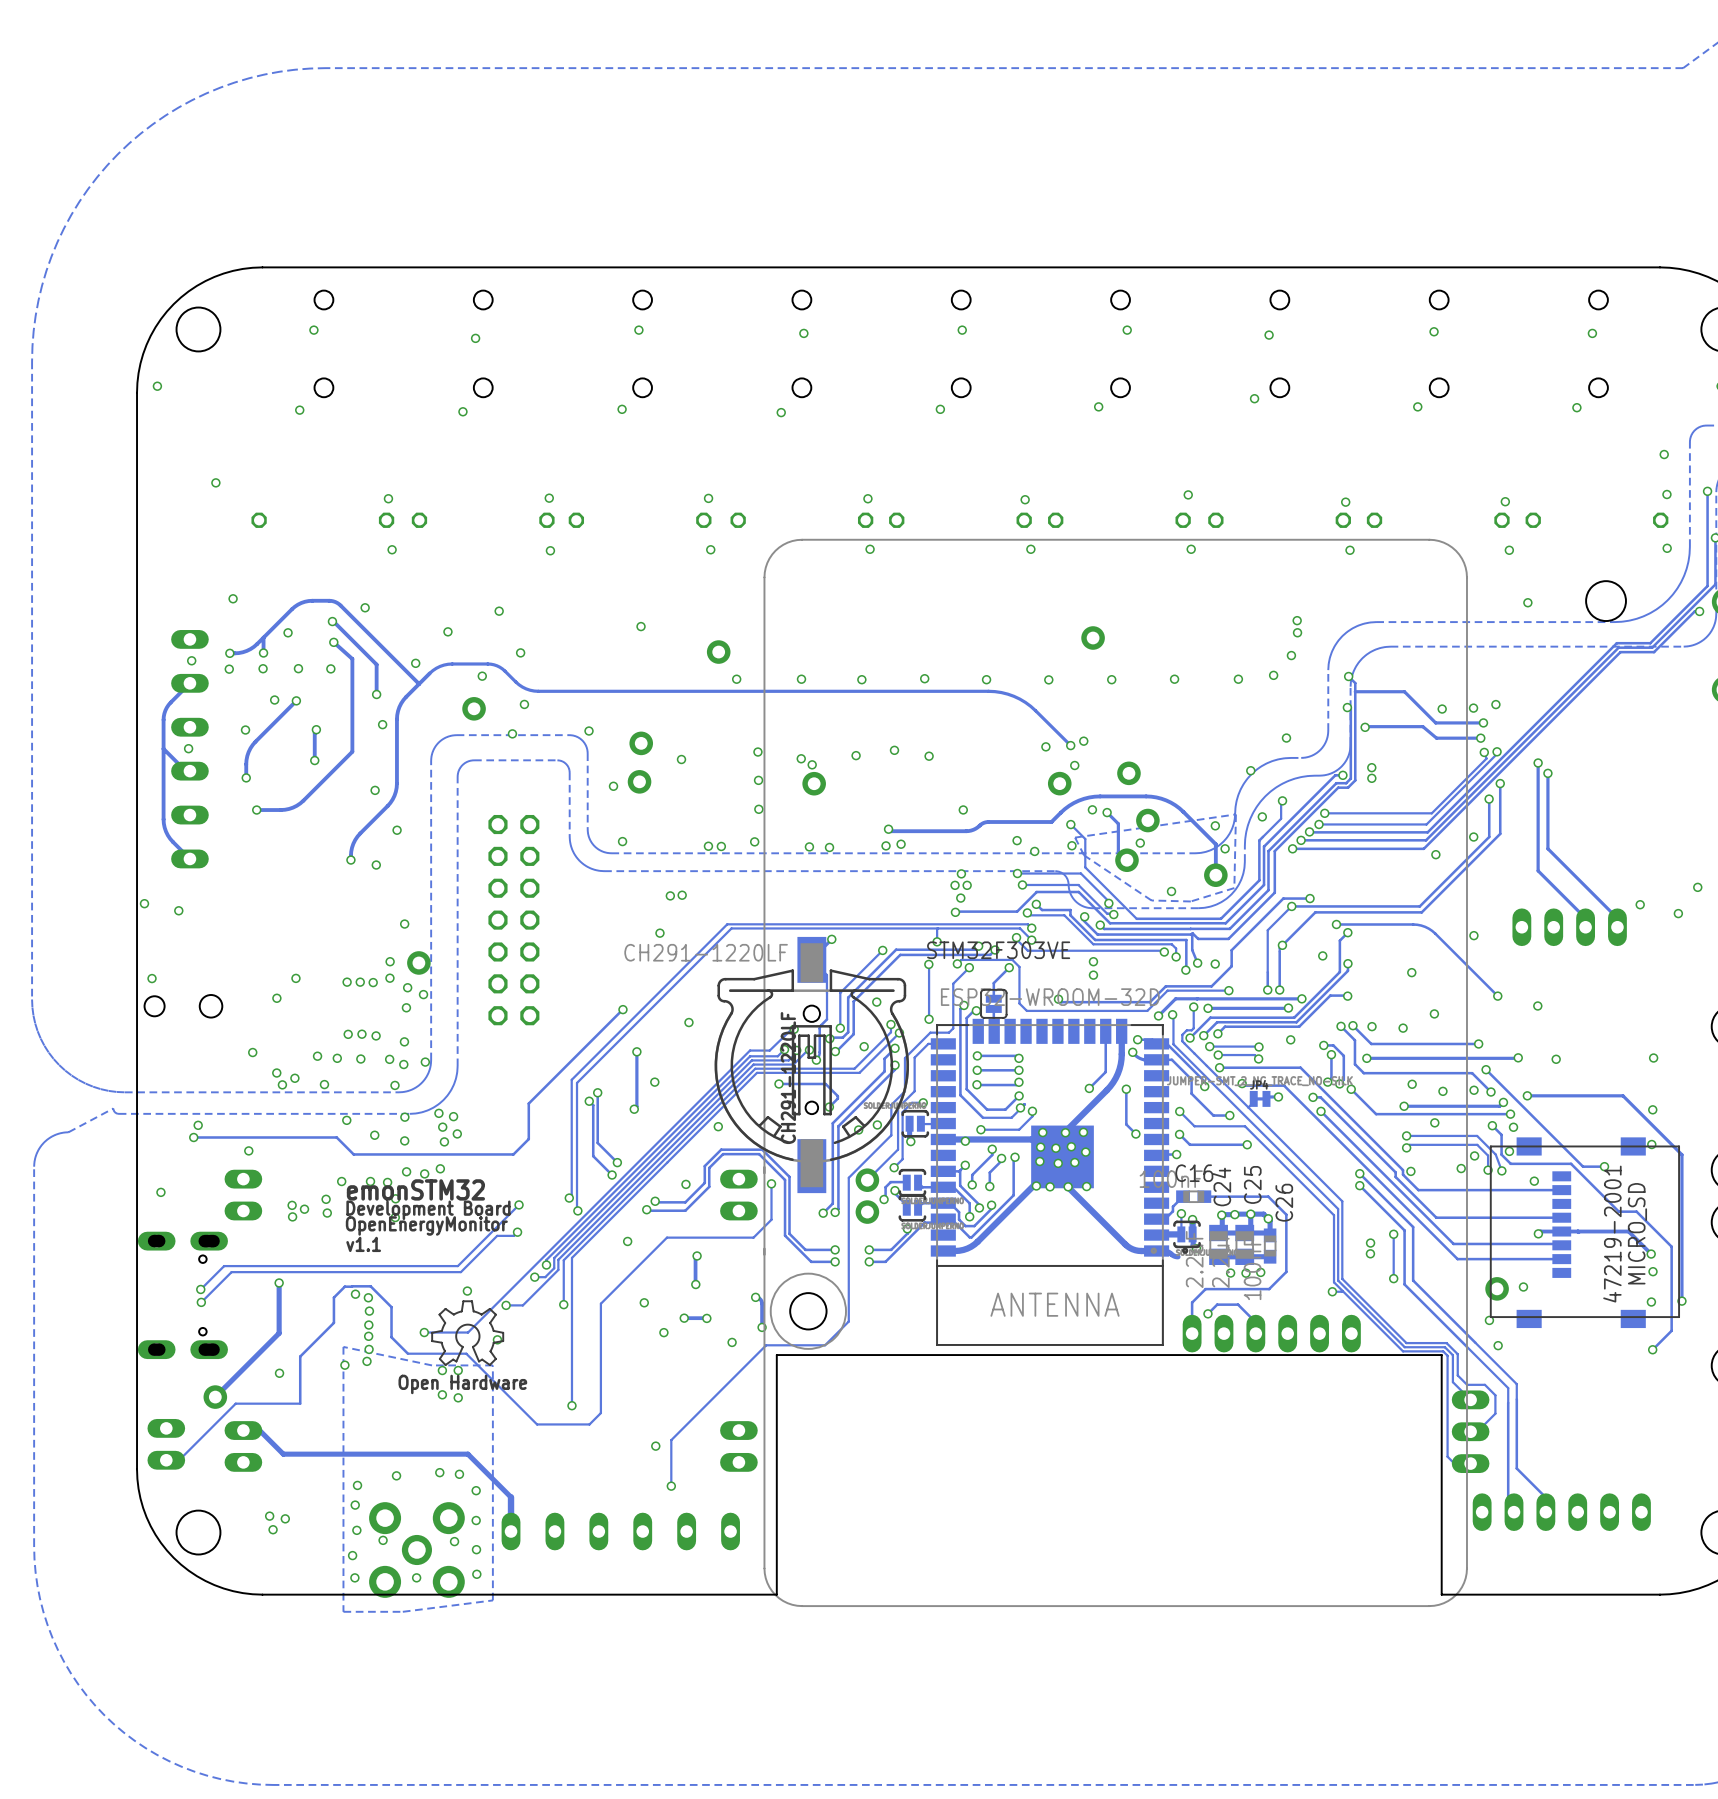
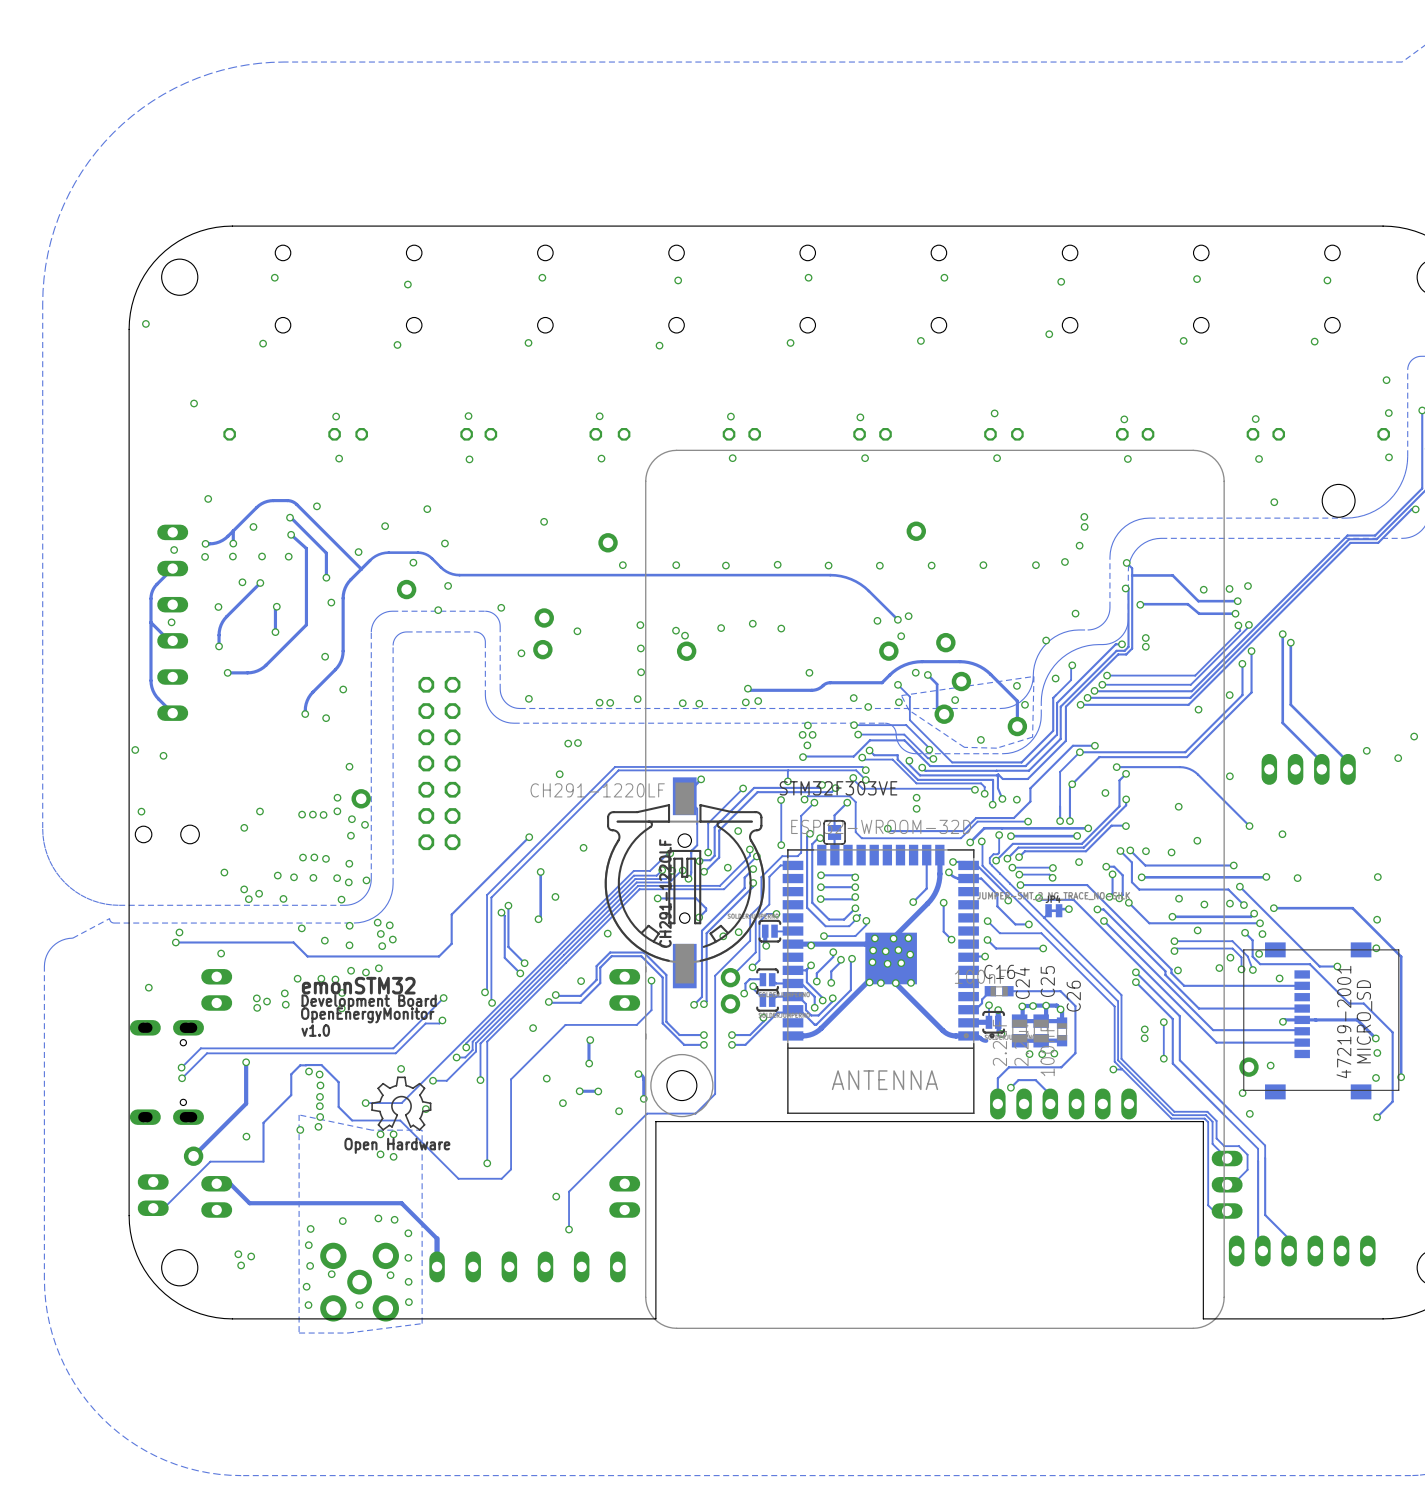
text: v1.1 (363, 1244) -> v1.0 (315, 1030)

